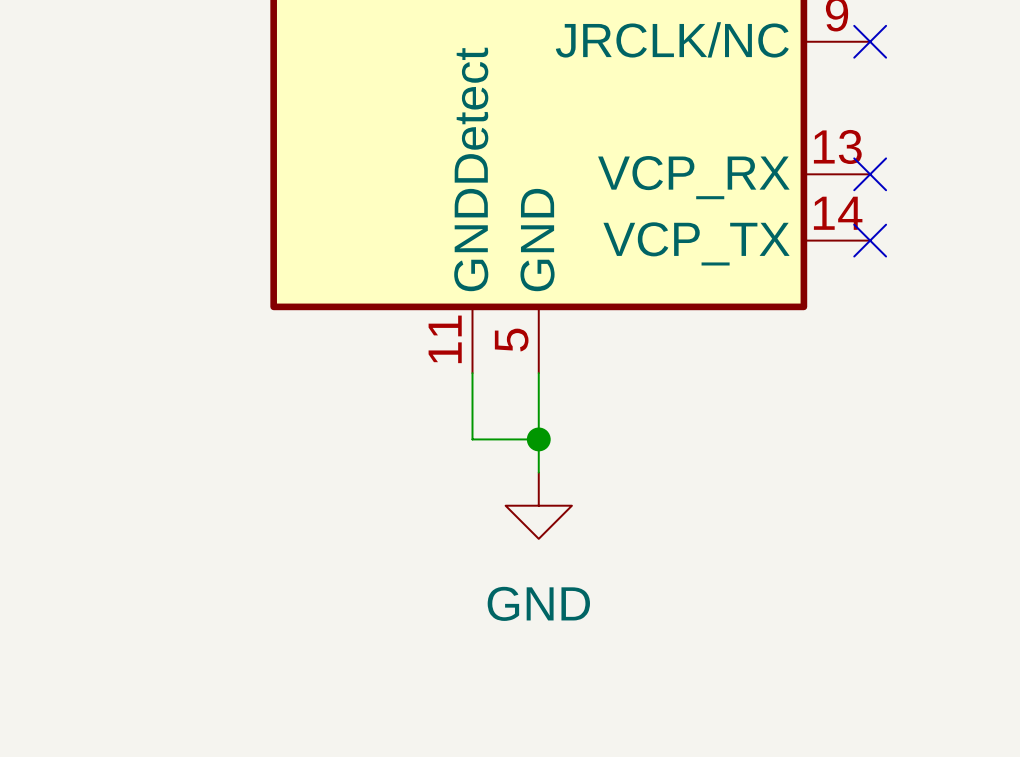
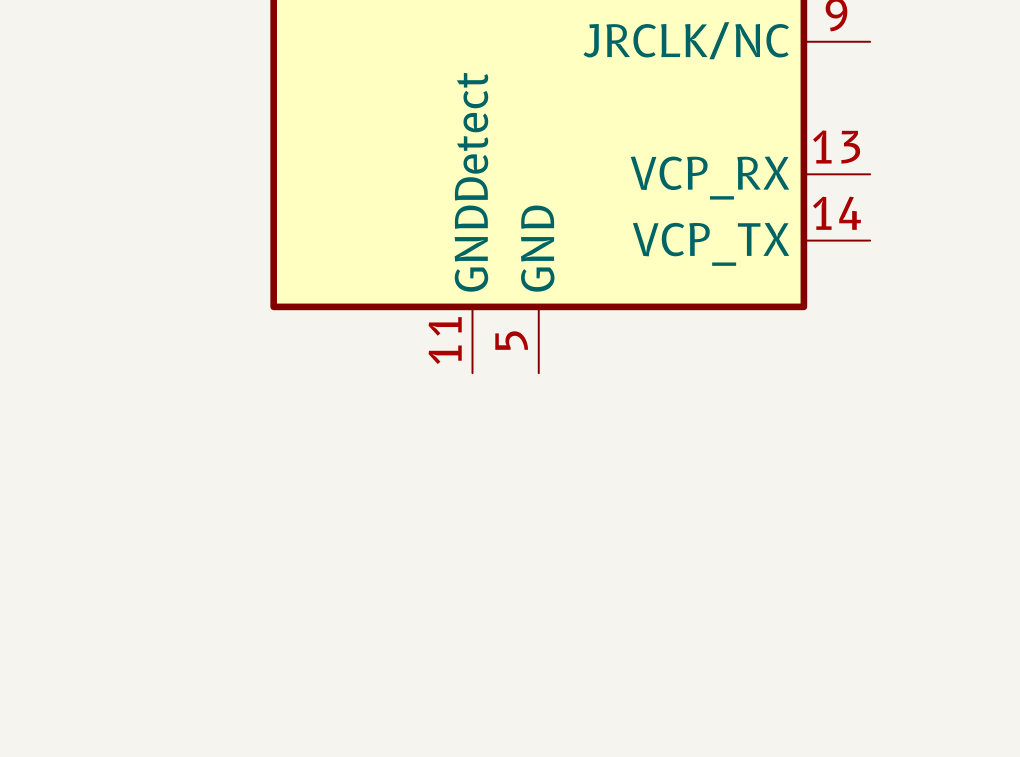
no-connect mark: (870, 41) -> none
no-connect mark: (870, 174) -> none
no-connect mark: (870, 240) -> none
wire: (472, 373) (472, 439) (538, 439) -> none
wire: (538, 373) (538, 472) -> none
junction: (538, 439) -> none
power symbol: GND (538, 505) -> none

